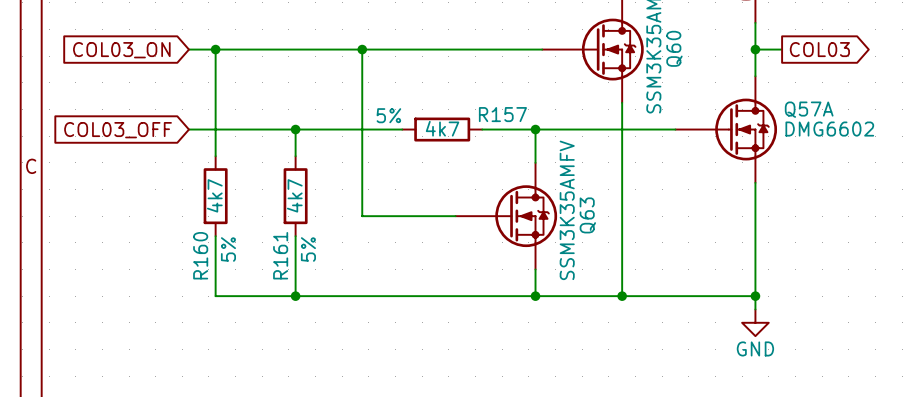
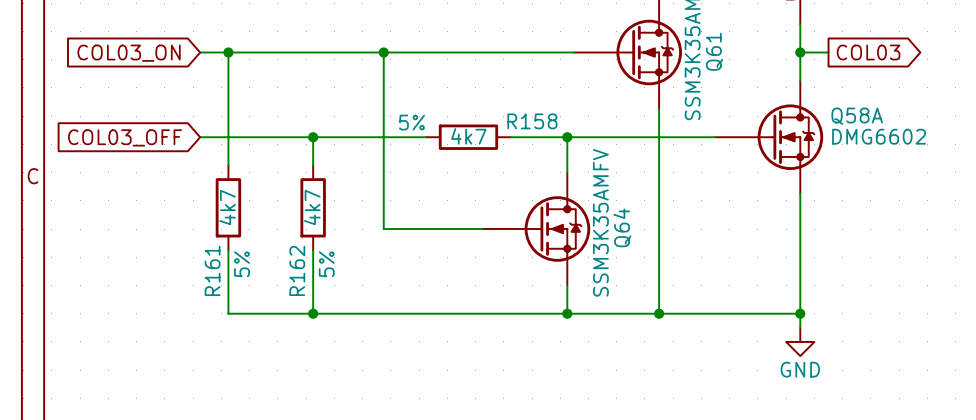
Q60 name: Q60 (674, 48) -> Q61 (714, 51)
Q57A name: Q57A (809, 109) -> Q58A (857, 116)
R157 name: R157 (502, 114) -> R158 (532, 121)
Q63 name: Q63 (587, 215) -> Q64 (622, 227)
R160 name: R160 (200, 255) -> R161 (212, 270)
R161 name: R161 (280, 255) -> R162 (297, 270)

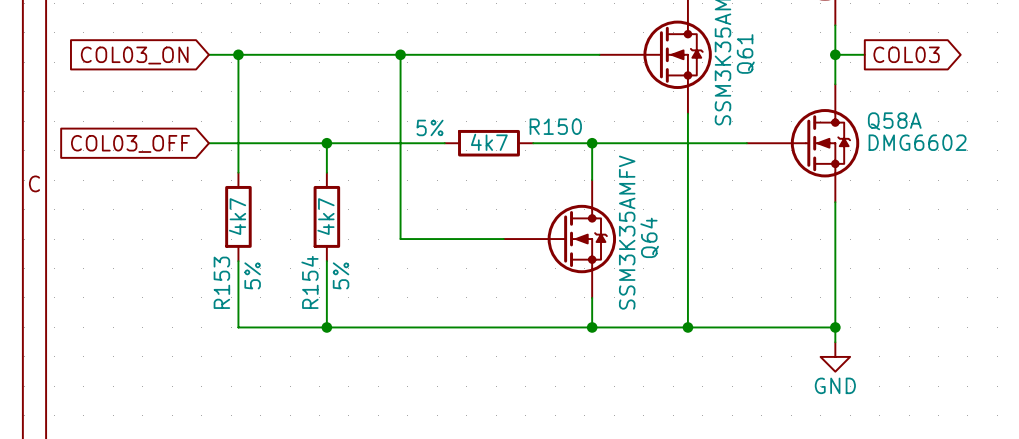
R158 name: R158 (532, 121) -> R150 (555, 126)
R161 name: R161 (212, 270) -> R153 (221, 282)
R162 name: R162 (297, 270) -> R154 (309, 282)

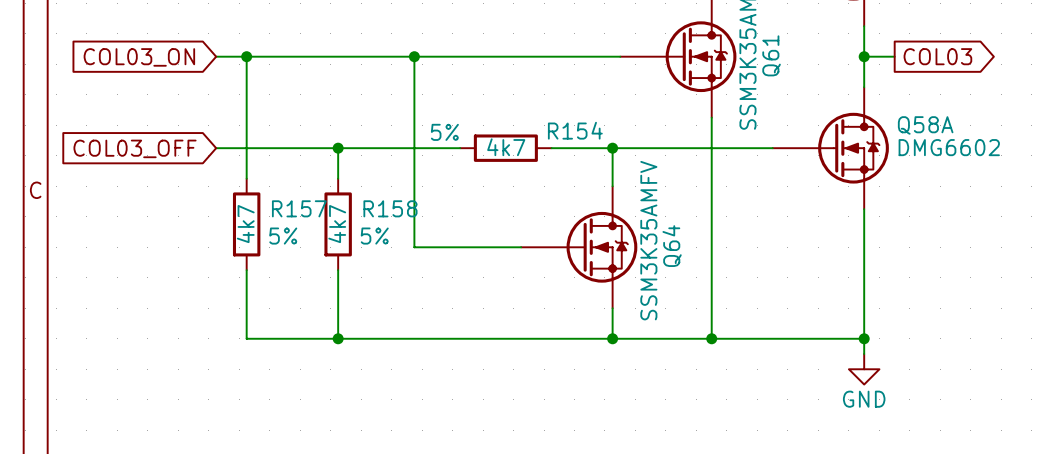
R150 name: R150 (555, 126) -> R154 (575, 130)
R153 text rotation: 0° (252, 275) -> 90° clockwise (283, 236)
R153 text position: 5% (252, 275) -> 5% (283, 236)
R154 text rotation: 0° (341, 275) -> 90° clockwise (374, 236)
R154 text position: 5% (341, 275) -> 5% (374, 236)
R153 name: R153 (221, 282) -> R157 (299, 208)
R154 name: R154 (309, 282) -> R158 (390, 208)

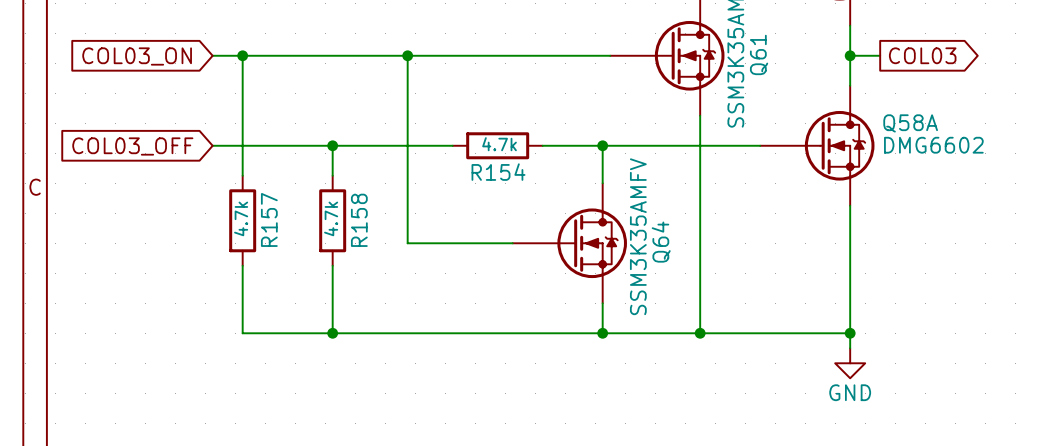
R154 name position: R154 (575, 130) -> R154 (498, 172)
R154 text: 5% (444, 132) -> none
R154 text: none -> 4.7k (499, 144)
R154 text: 4k7 (506, 147) -> none
R157 name rotation: 0° (299, 208) -> 90° counterclockwise (269, 219)
R158 name rotation: 0° (390, 208) -> 90° counterclockwise (359, 220)
R157 text: none -> 4.7k (241, 218)
R158 text: none -> 4.7k (331, 218)
R157 text: 4k7 (245, 224) -> none
R158 text: 4k7 (337, 224) -> none
R157 text: 5% (283, 236) -> none
R158 text: 5% (374, 236) -> none

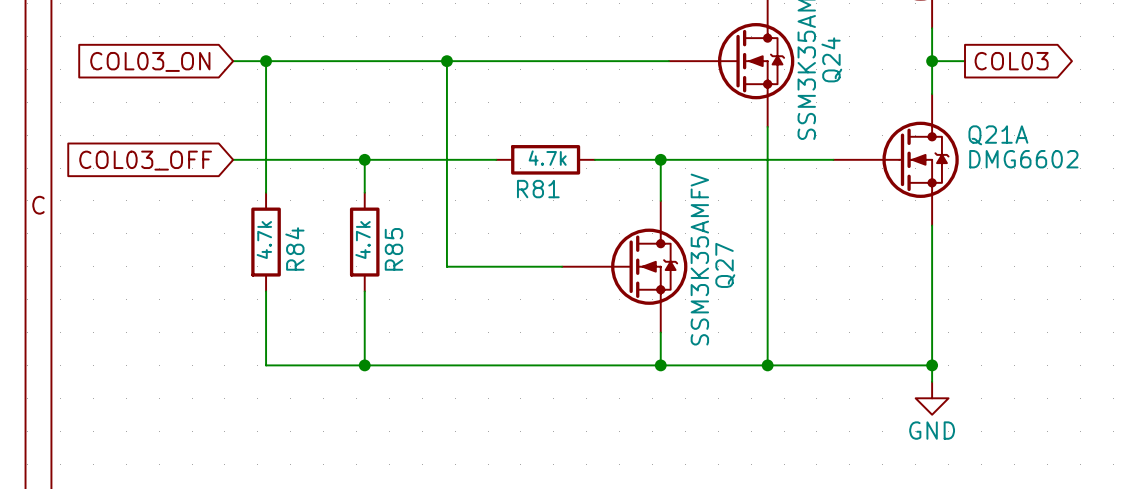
Q61 name: Q61 (759, 54) -> Q24 (831, 59)
Q58A name: Q58A (910, 123) -> Q21A (998, 135)
R154 name: R154 (498, 172) -> R81 (538, 189)
R157 name: R157 (269, 219) -> R84 (294, 248)
R158 name: R158 (359, 220) -> R85 (393, 249)
Q64 name: Q64 (661, 242) -> Q27 (725, 265)

